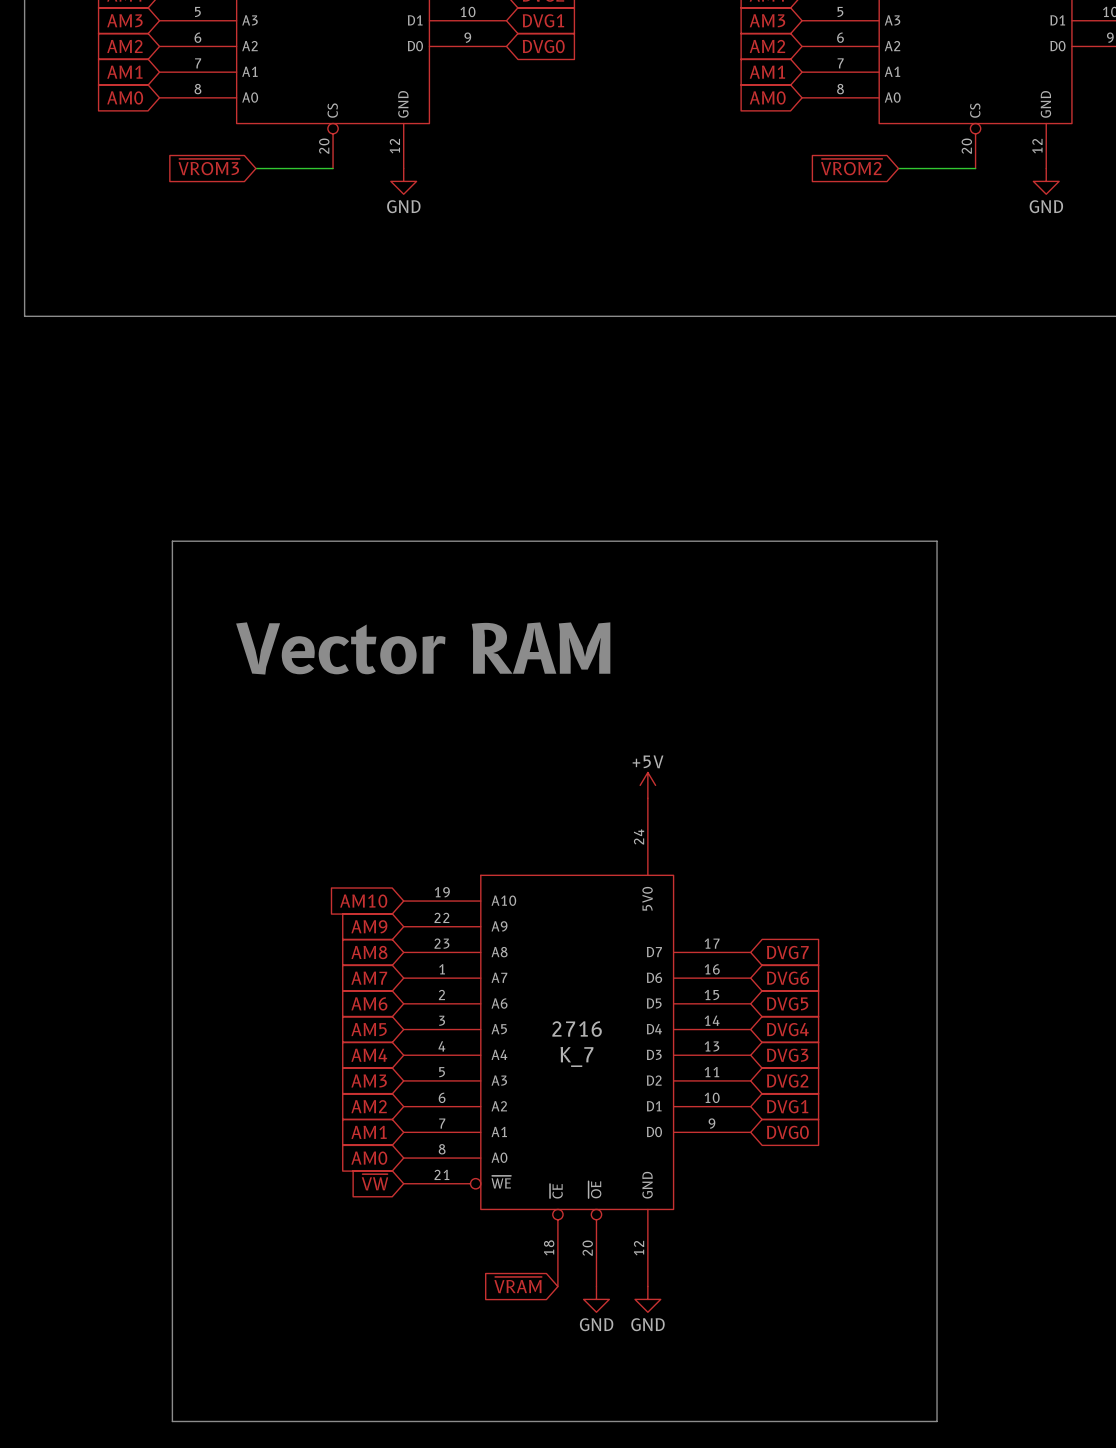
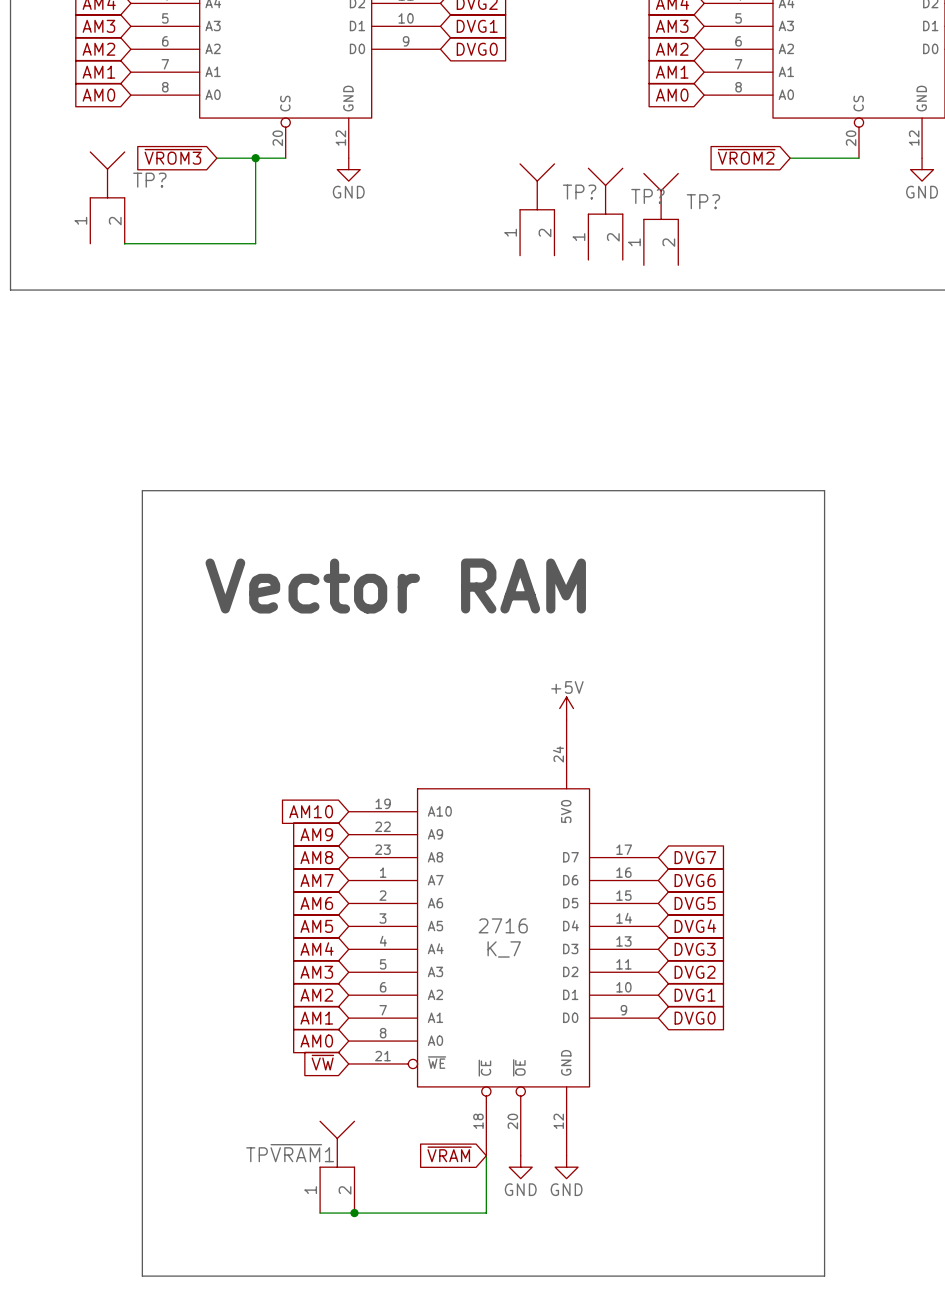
wire: none -> (255, 158) (255, 243) (124, 243)
junction: none -> (255, 158)
TP?: none -> (107, 197)
TP?: none -> (537, 209)
TP?: none -> (605, 214)
TP?: none -> (661, 219)
wire: none -> (486, 1155) (486, 1213) (320, 1213)
TP~{VRAM}1: none -> (337, 1167)
junction: none -> (354, 1213)

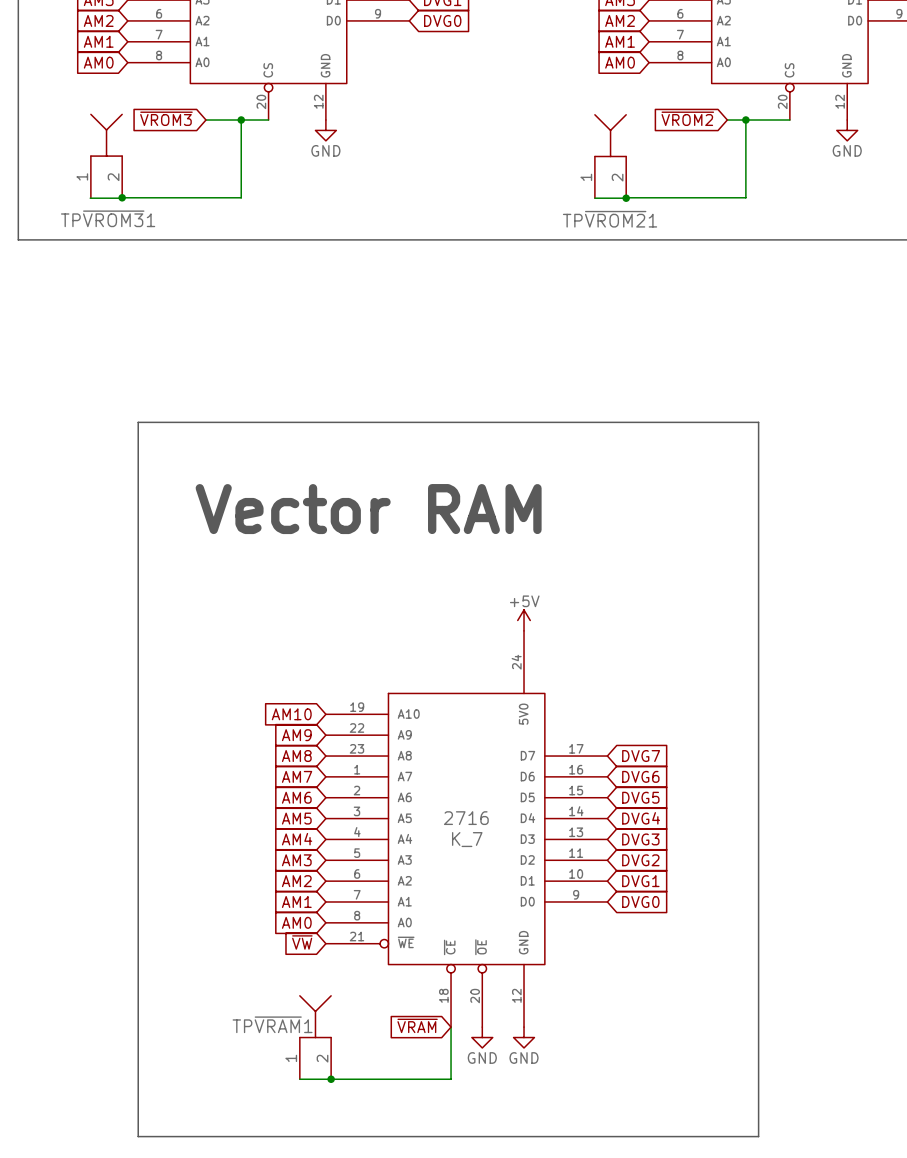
wire: none -> (745, 120) (745, 197) (626, 197)
junction: none -> (745, 120)
TP? name: TP? (149, 180) -> TP~{VROM3}1 (108, 218)
TP~{VROM2}1: none -> (610, 156)
TP?: (537, 209) -> none
TP?: (605, 214) -> none
TP?: (661, 219) -> none
junction: none -> (122, 197)
wire: none -> (90, 198) (121, 198)
wire: none -> (594, 198) (626, 198)
junction: none -> (626, 198)

